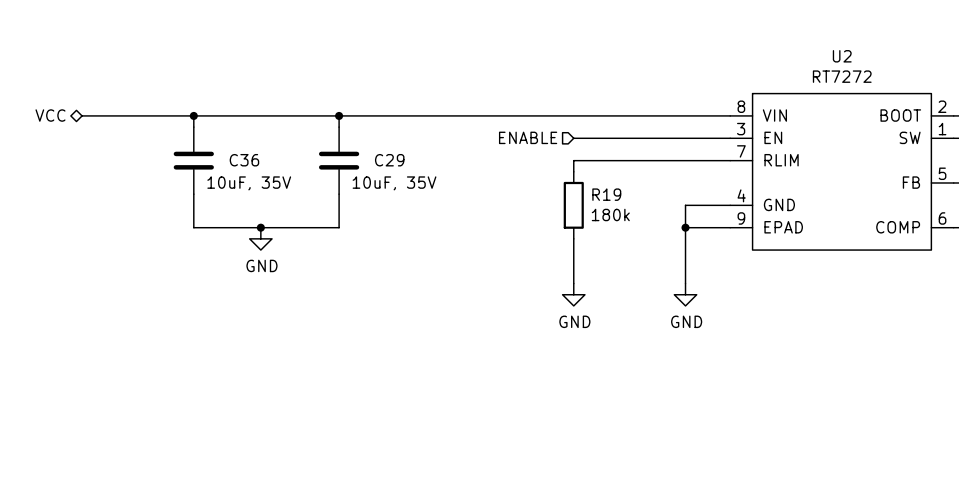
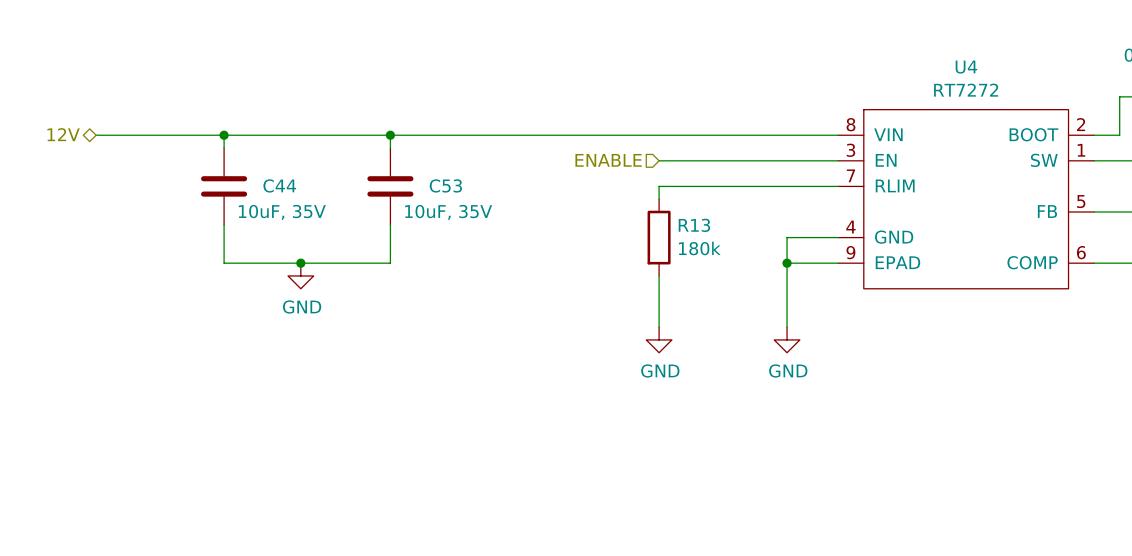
U2 name: U2 (842, 56) -> U4 (966, 67)
hierarchical label: VCC (50, 115) -> 12V (63, 134)
C36 name: C36 (244, 160) -> C44 (279, 185)
C29 name: C29 (389, 160) -> C53 (445, 185)
R19 name: R19 (606, 194) -> R13 (694, 225)

